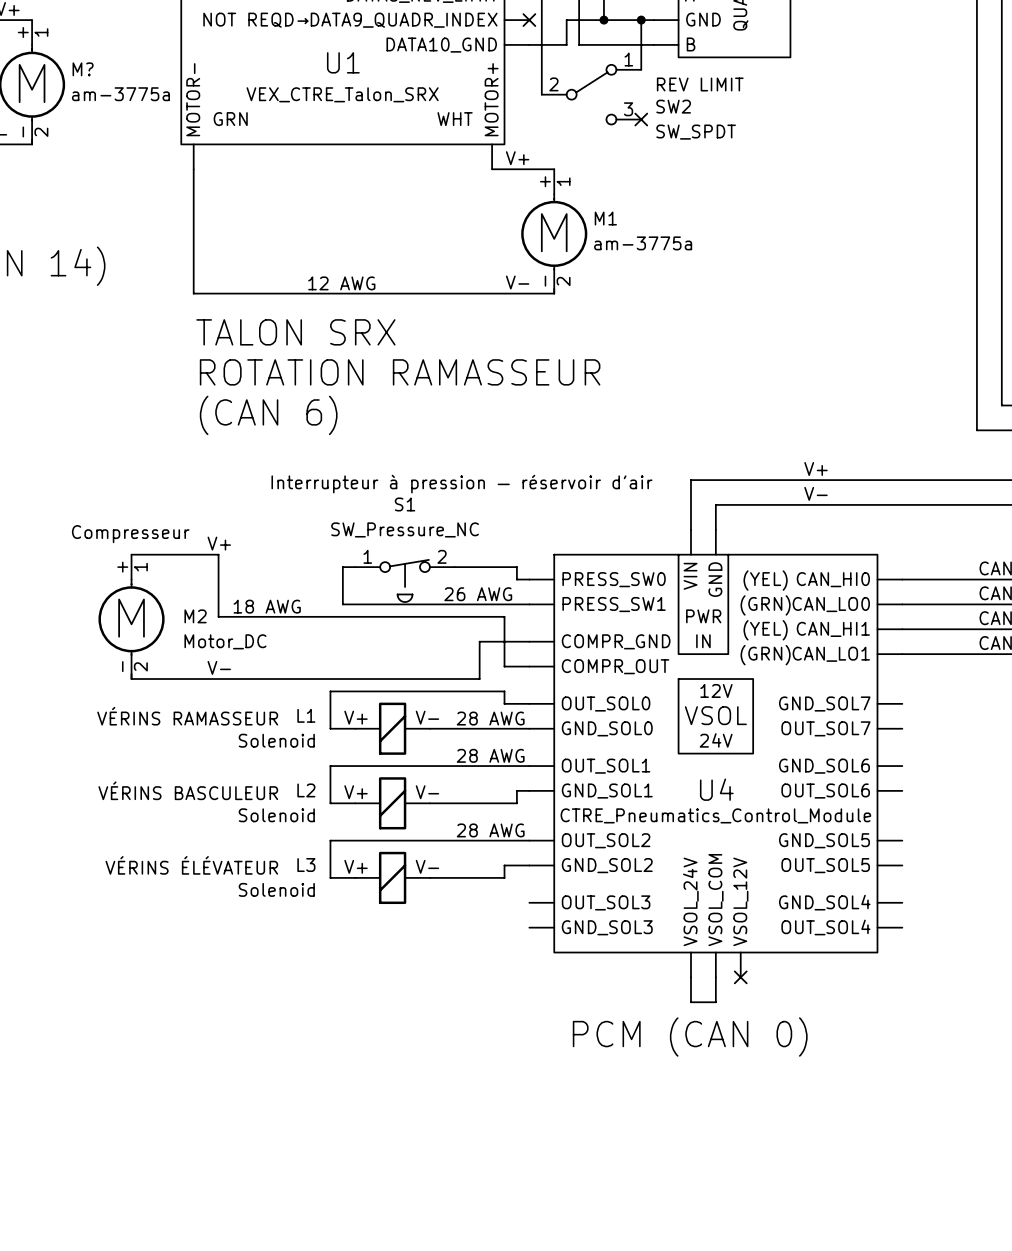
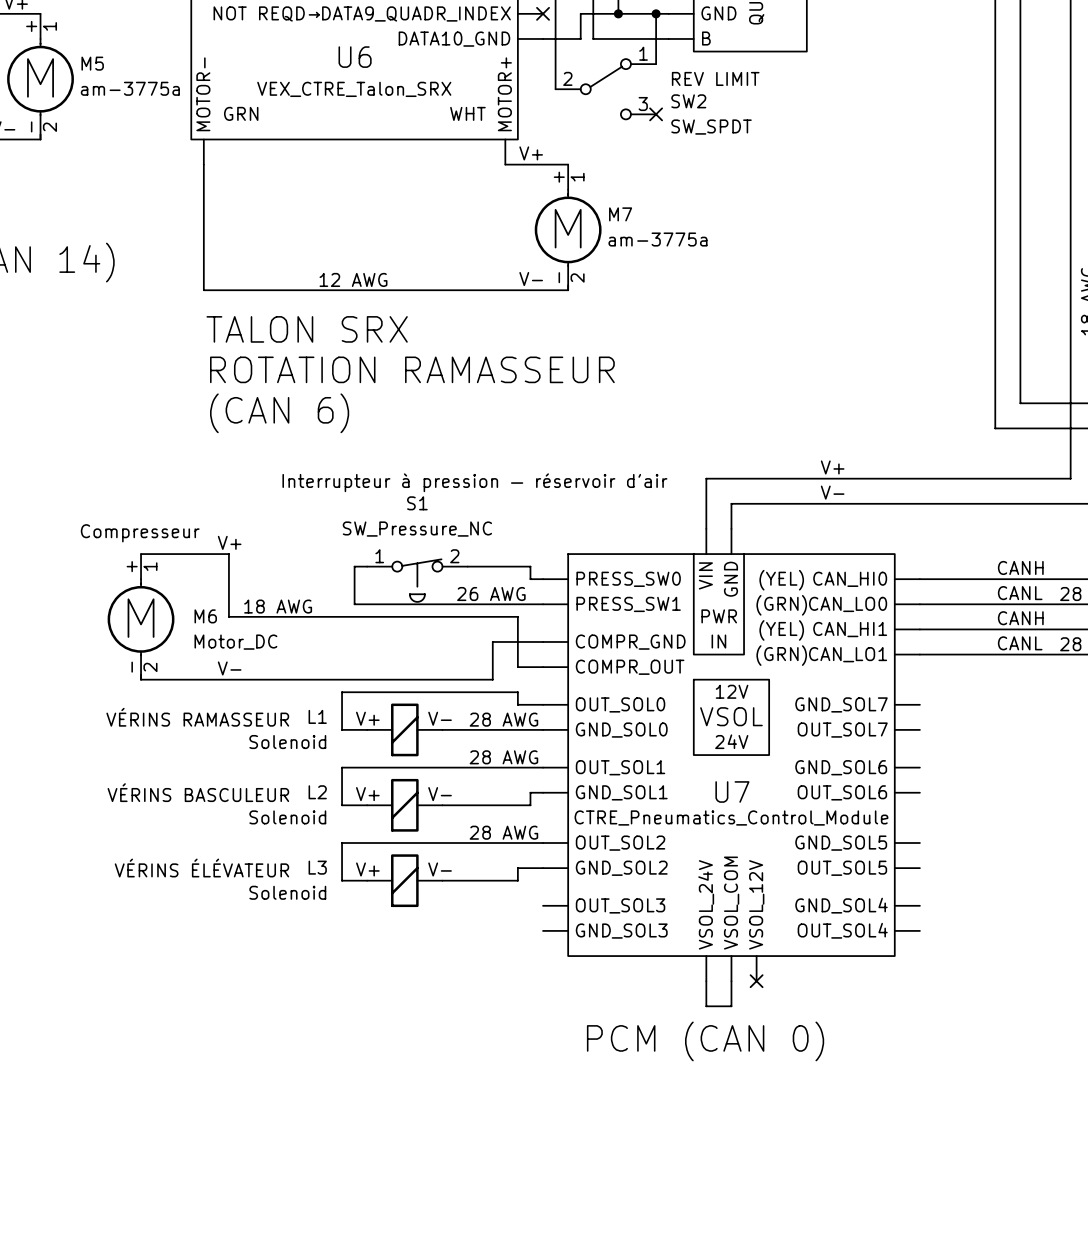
U1 name: U1 (343, 62) -> U6 (355, 57)
M? name: M? (83, 69) -> M5 (92, 63)
M1 name: M1 (605, 218) -> M7 (620, 214)
M2 name: M2 (195, 616) -> M6 (205, 616)
U4 name: U4 (716, 789) -> U7 (732, 791)

